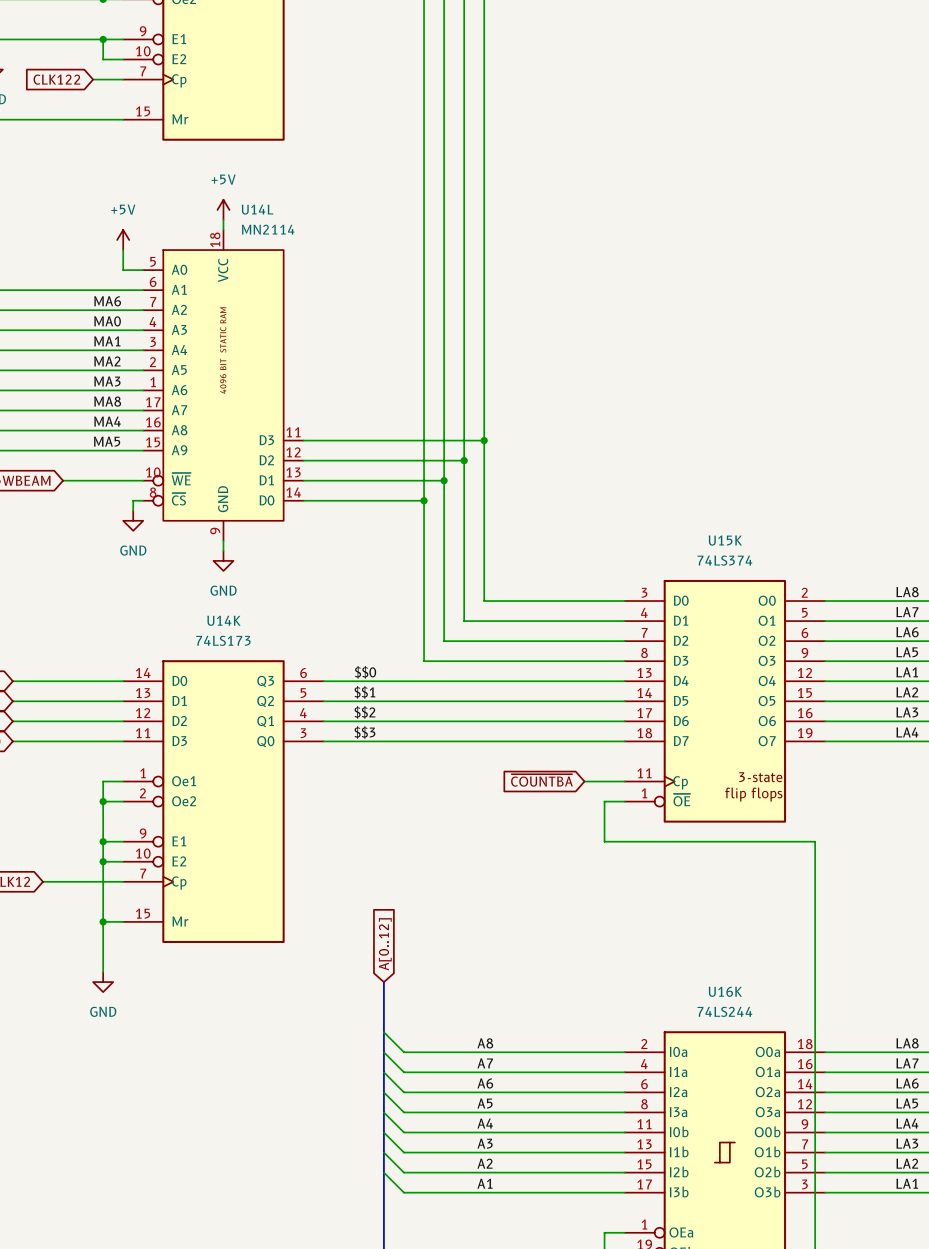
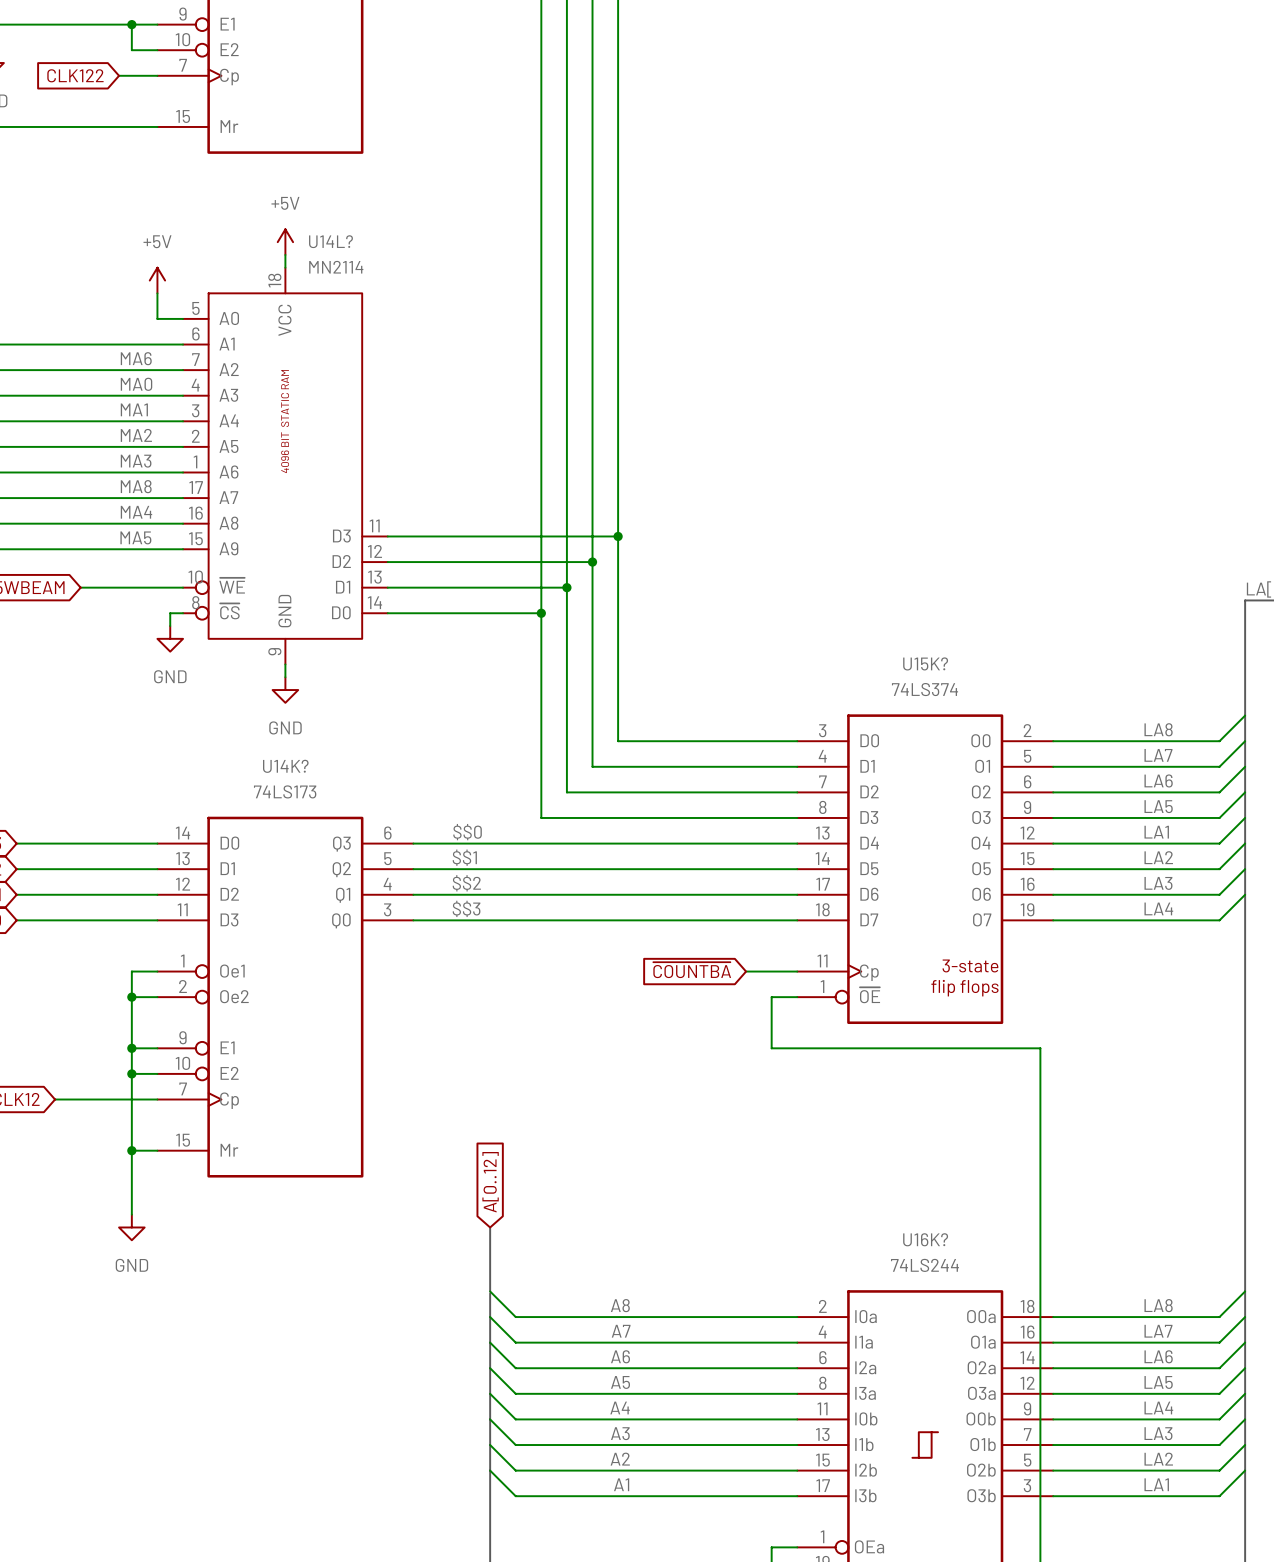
U14L name: U14L (257, 209) -> U14L? (330, 241)
U15K name: U15K (725, 540) -> U15K? (925, 663)
U14K name: U14K (223, 620) -> U14K? (285, 766)
U16K name: U16K (725, 991) -> U16K? (925, 1239)

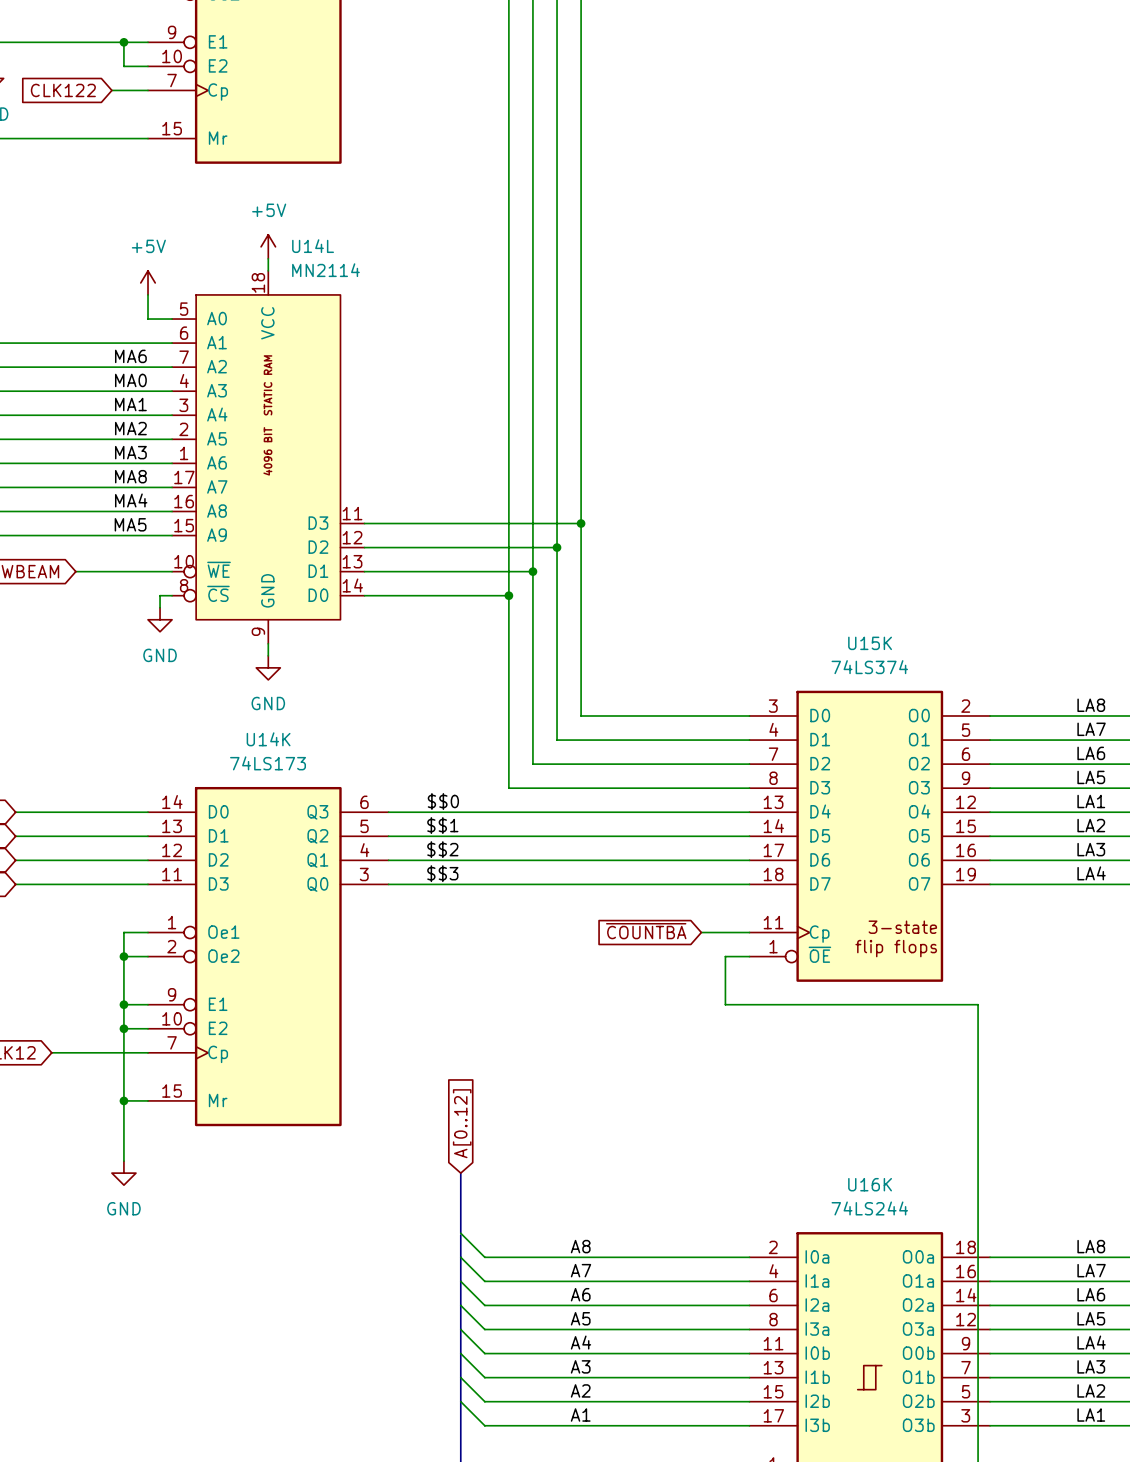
U14L? name: U14L? (330, 241) -> U14L (313, 246)
U15K? name: U15K? (925, 663) -> U15K (870, 643)
U14K? name: U14K? (285, 766) -> U14K (268, 739)
U16K? name: U16K? (925, 1239) -> U16K (870, 1184)

